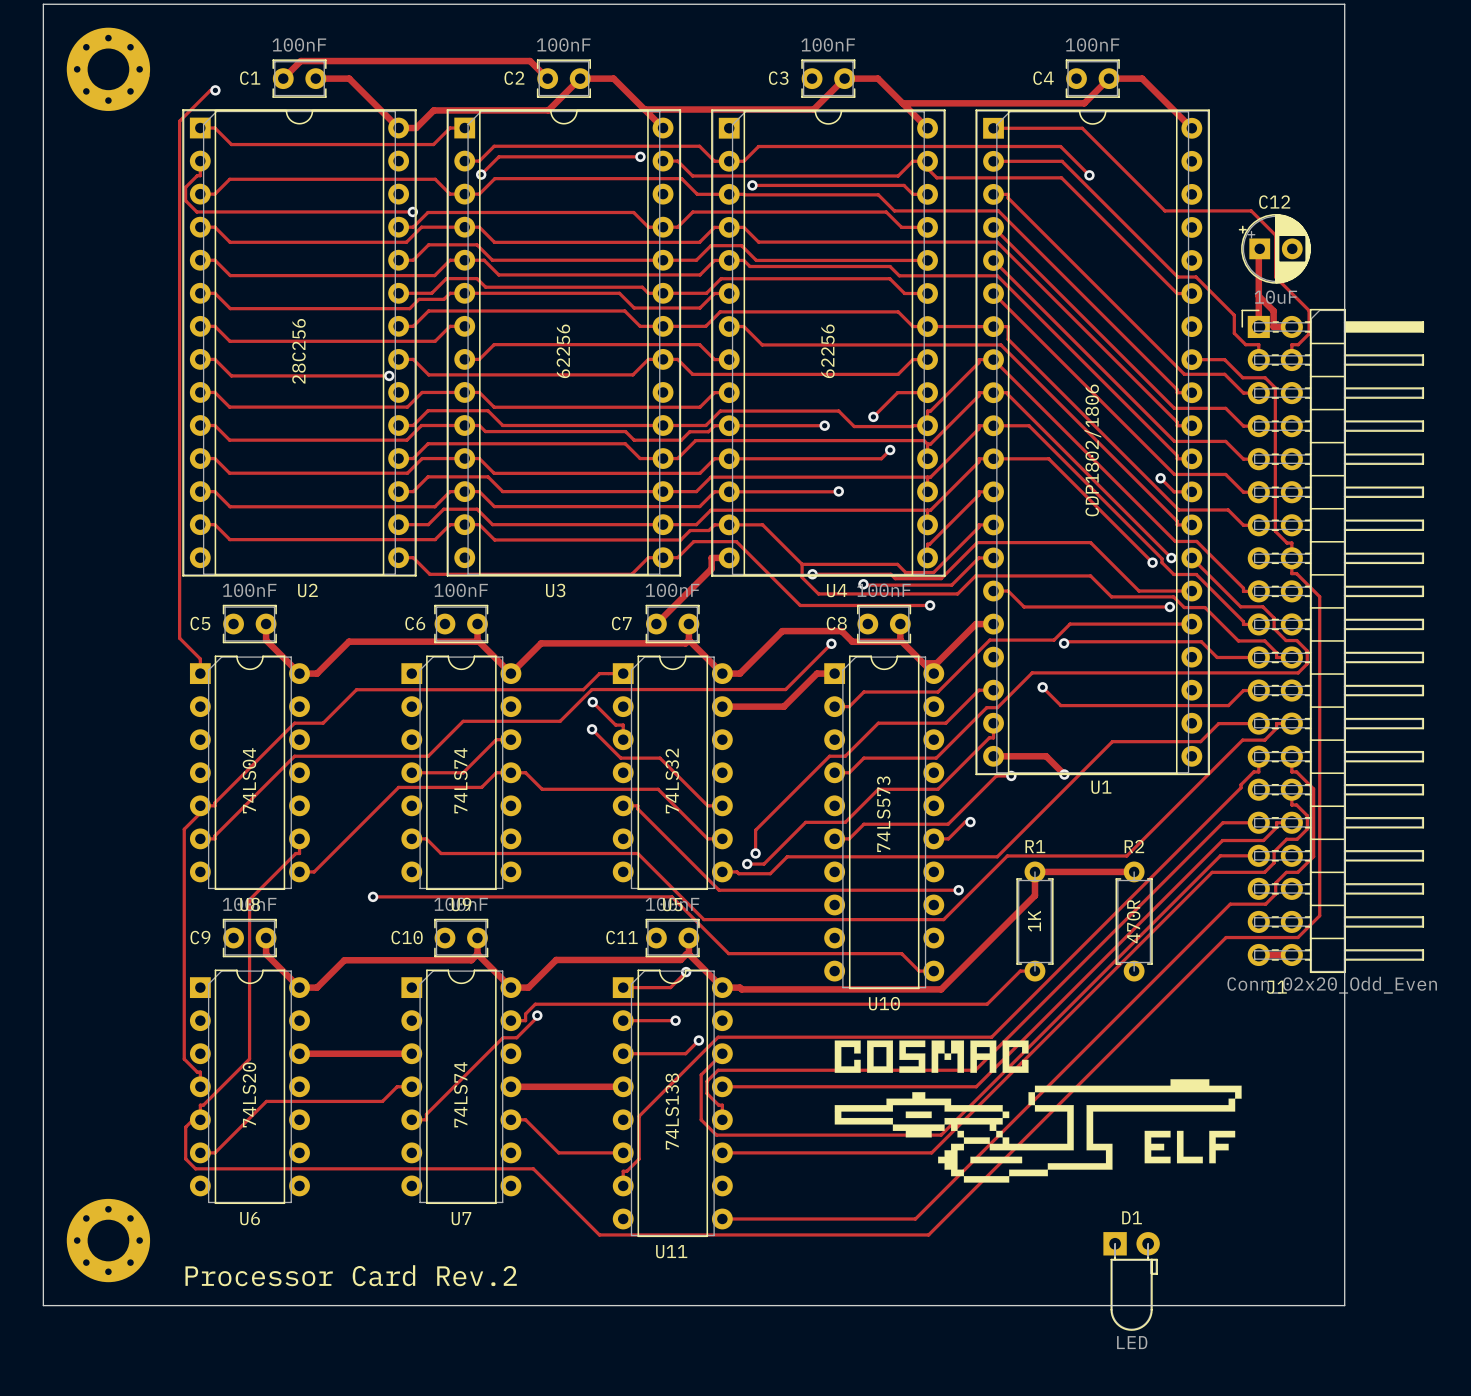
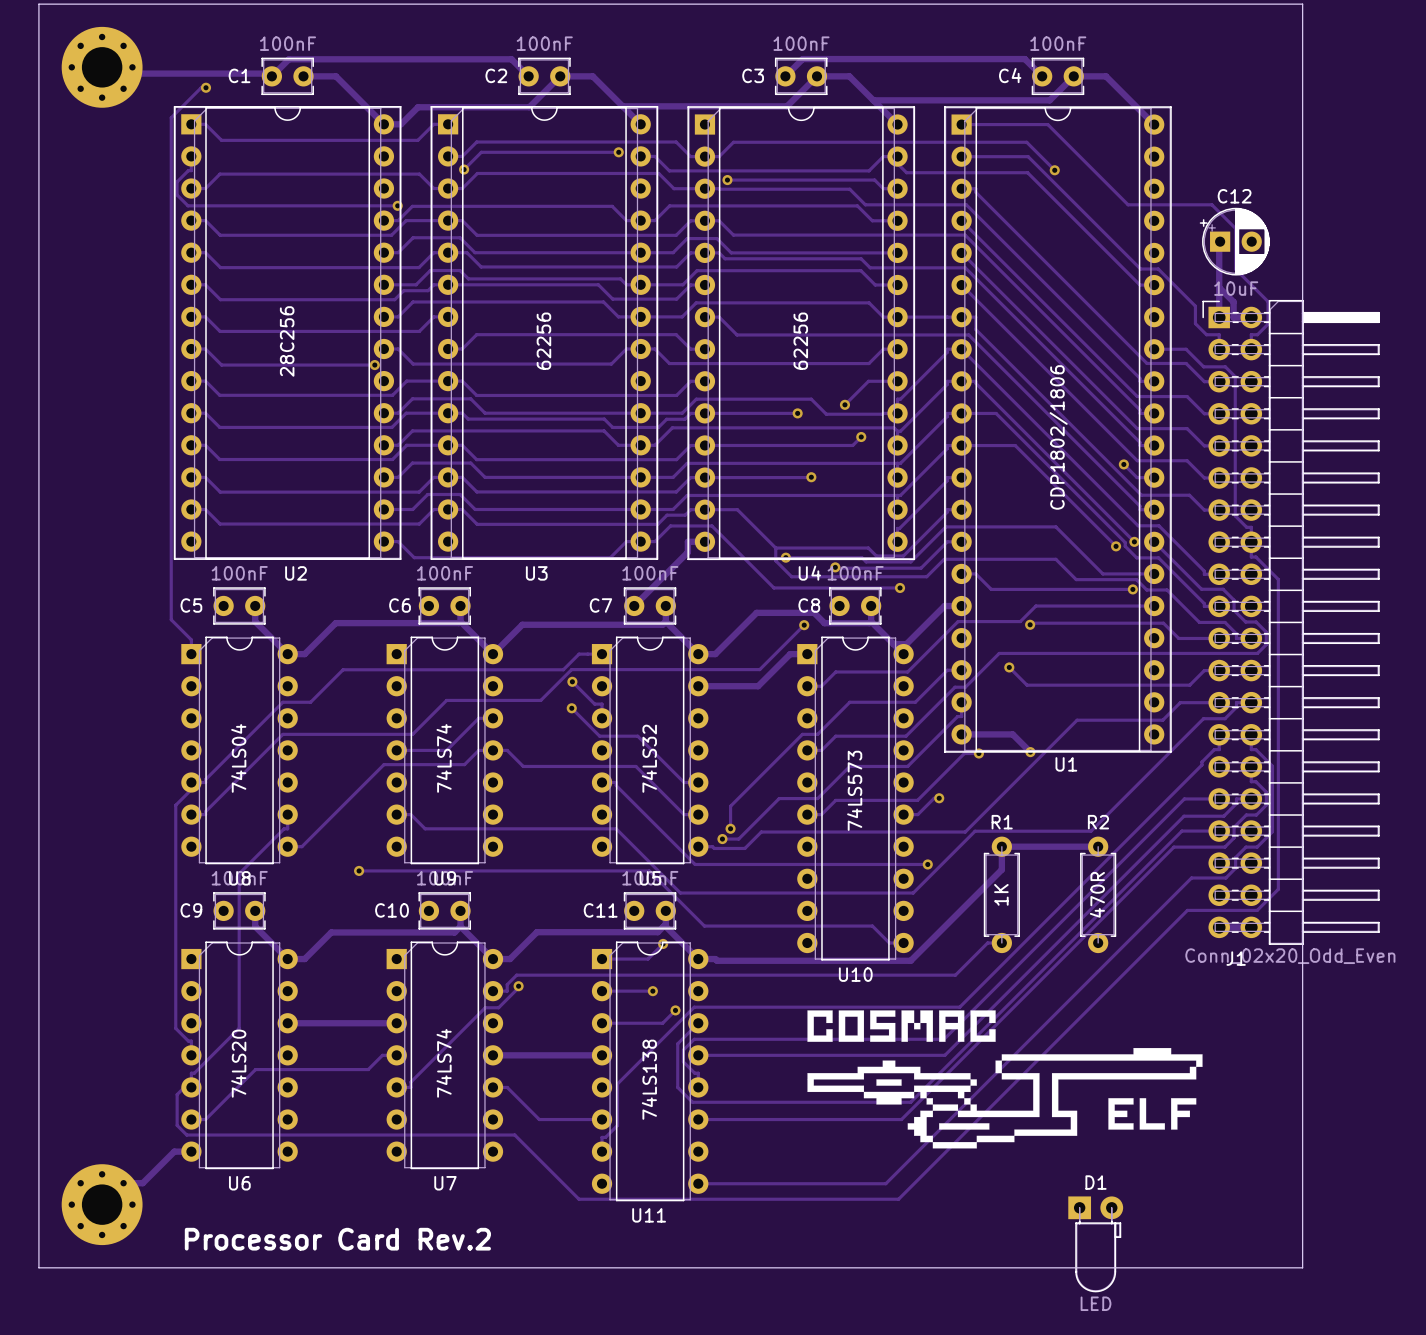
track: none -> (138, 73) (269, 73) (271, 76)
track: none -> (785, 76) (802, 59) (1024, 59) (1042, 76)
track: none -> (191, 1151) (174, 1151) (142, 1183) (132, 1183)

